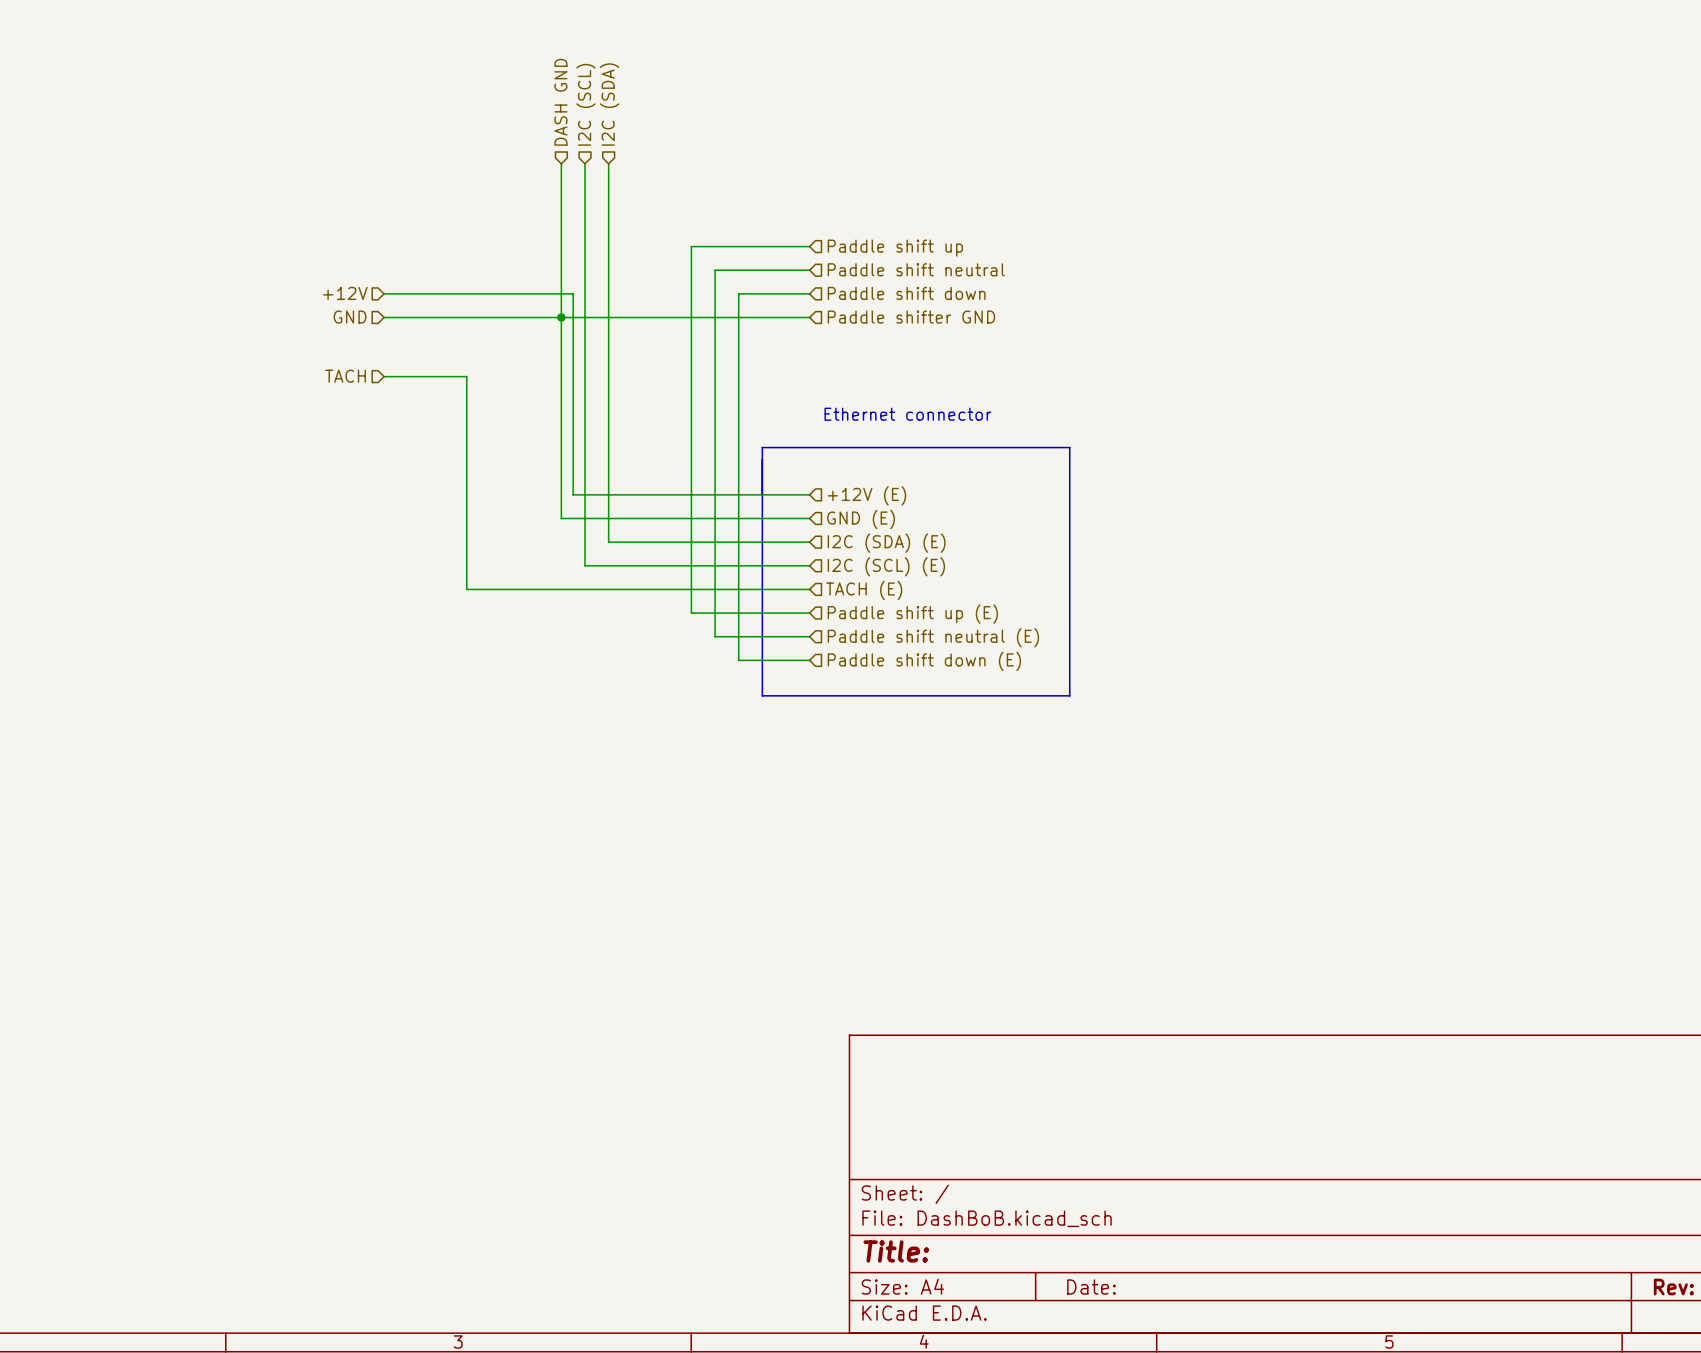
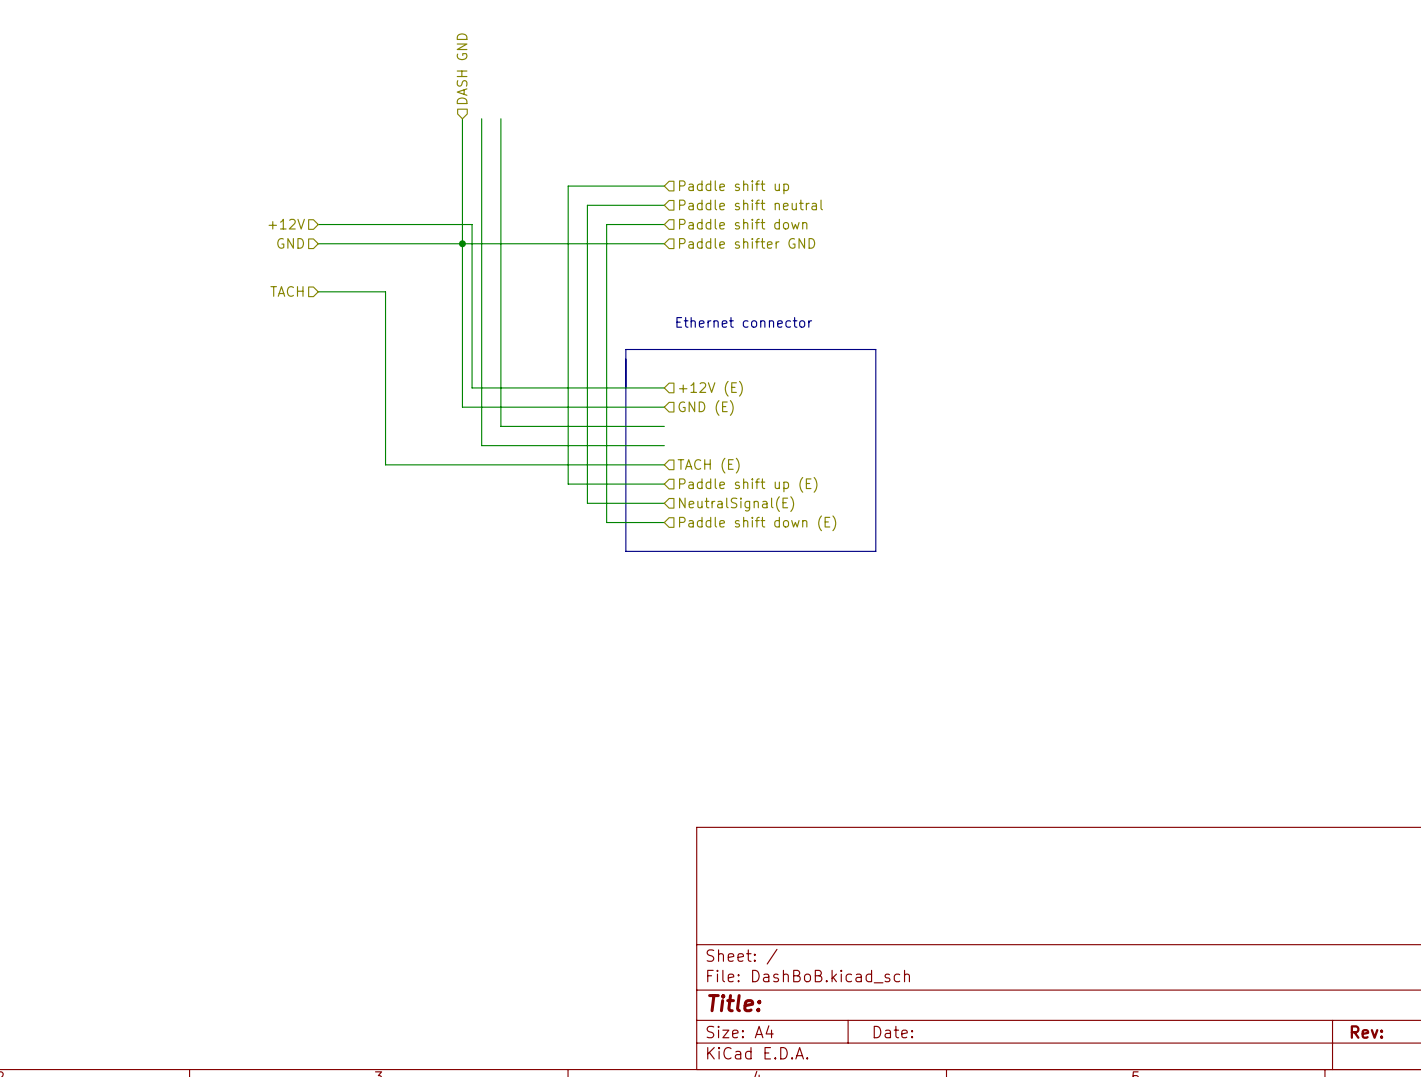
hierarchical label: I2C (SCL) (585, 104) -> none
hierarchical label: I2C (SDA) (609, 104) -> none
hierarchical label: I2C (SDA) (E) (886, 543) -> none
hierarchical label: I2C (SCL) (E) (886, 566) -> none
hierarchical label: Paddle shift neutral (E) (933, 637) -> NeutralSignal(E) (736, 504)

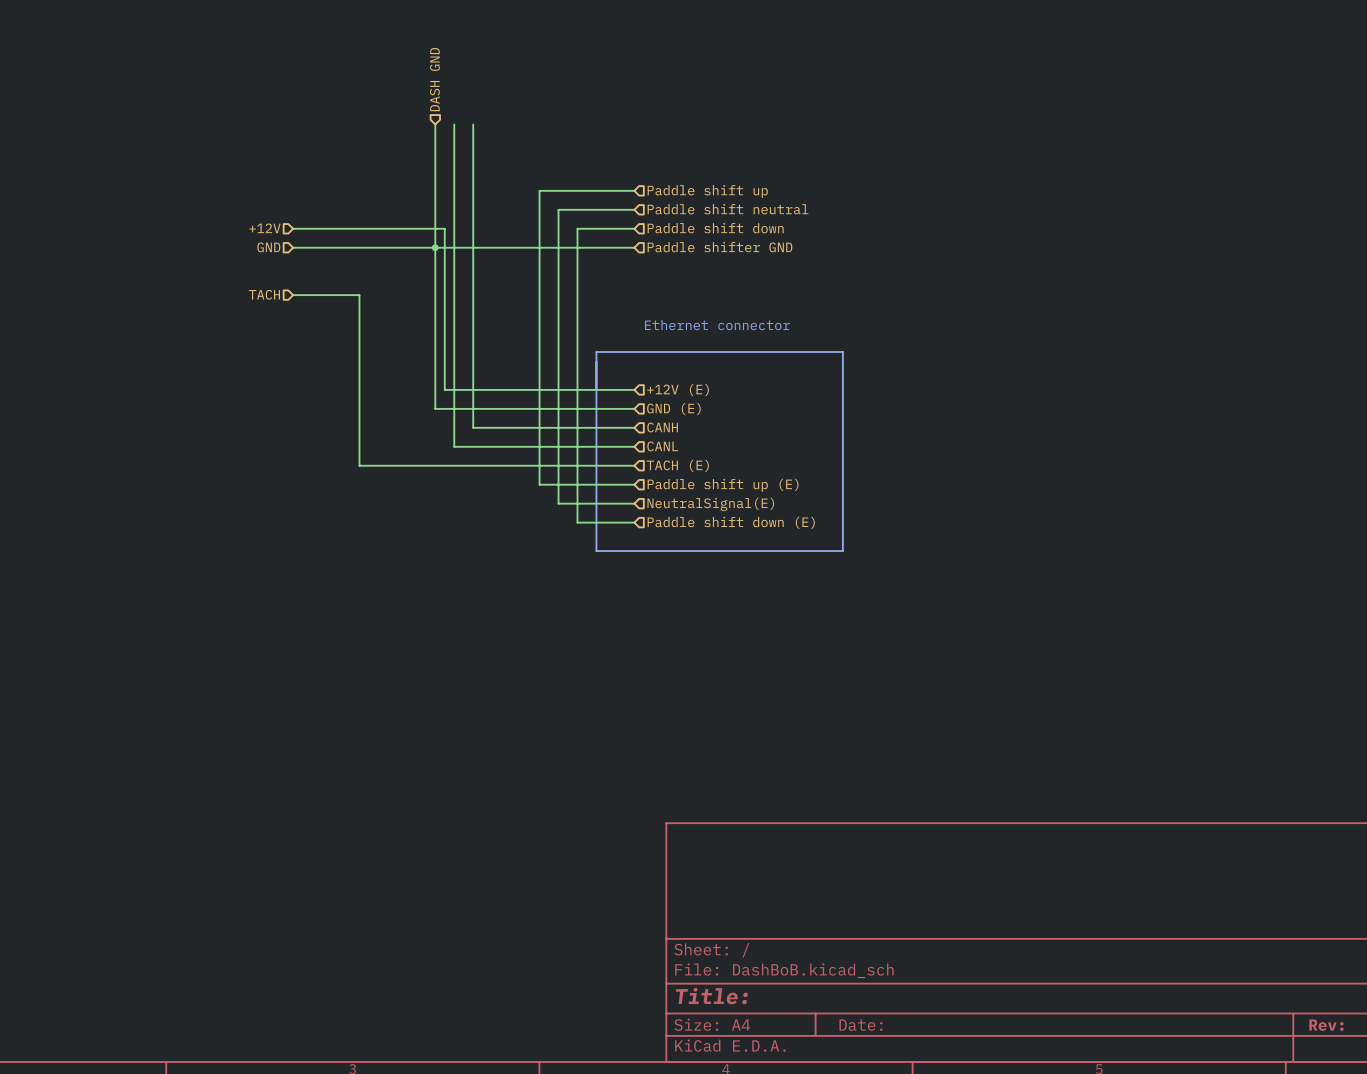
hierarchical label: none -> CANH (662, 427)
hierarchical label: none -> CANL (662, 446)

